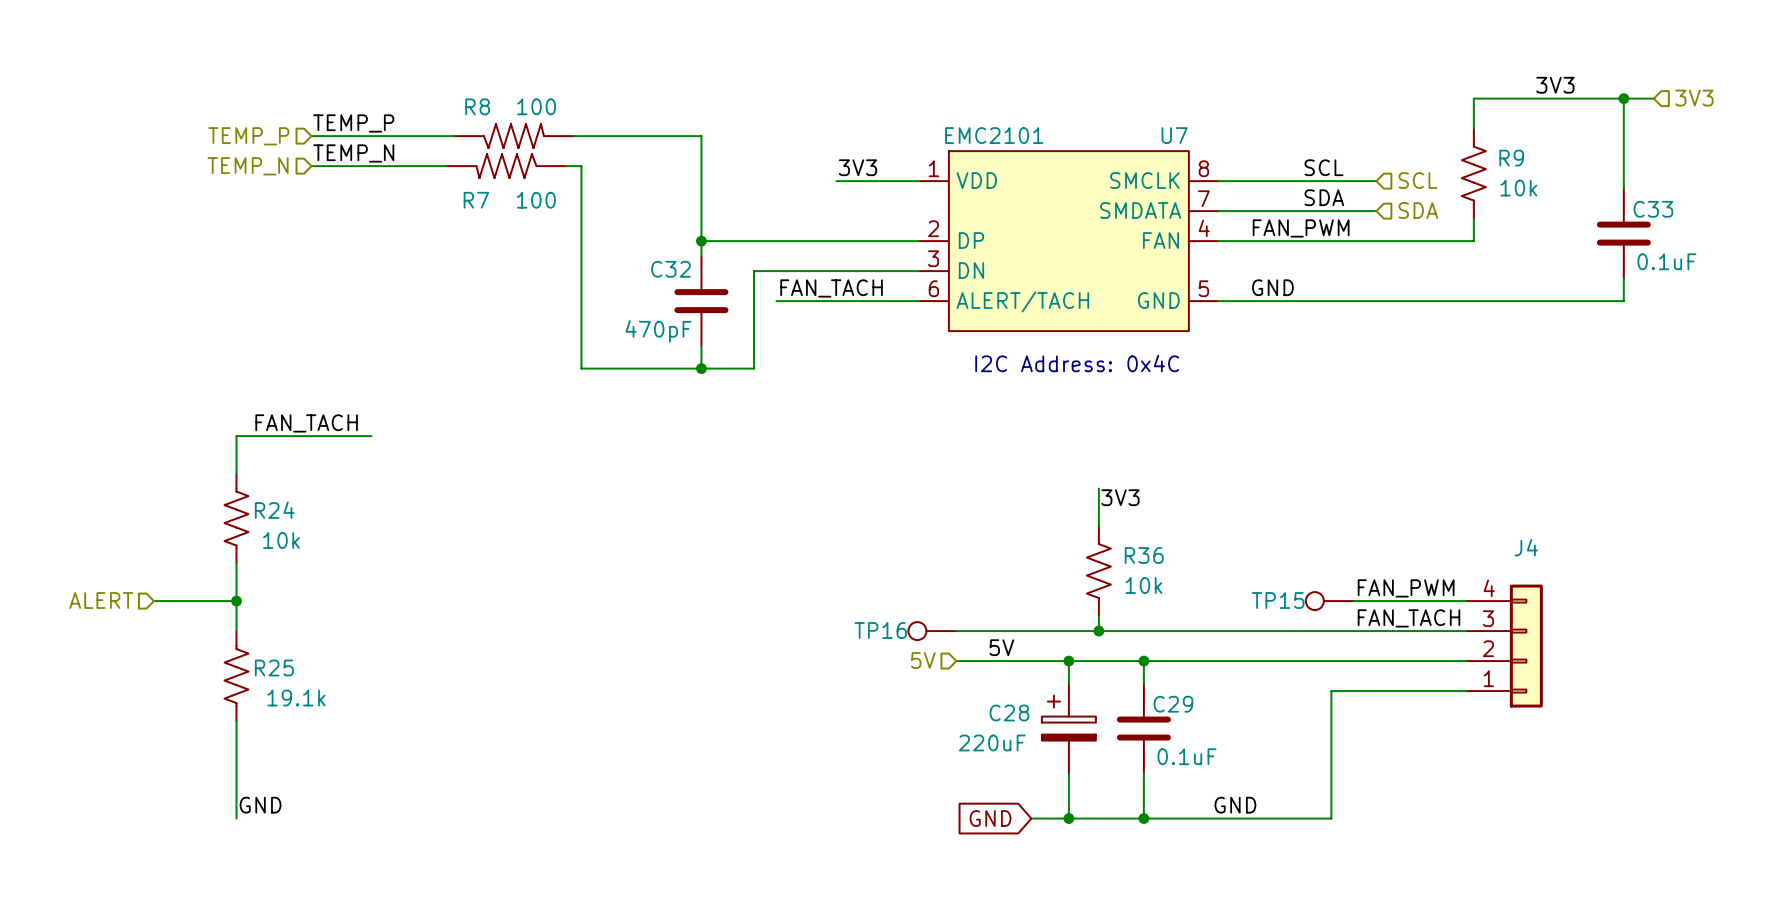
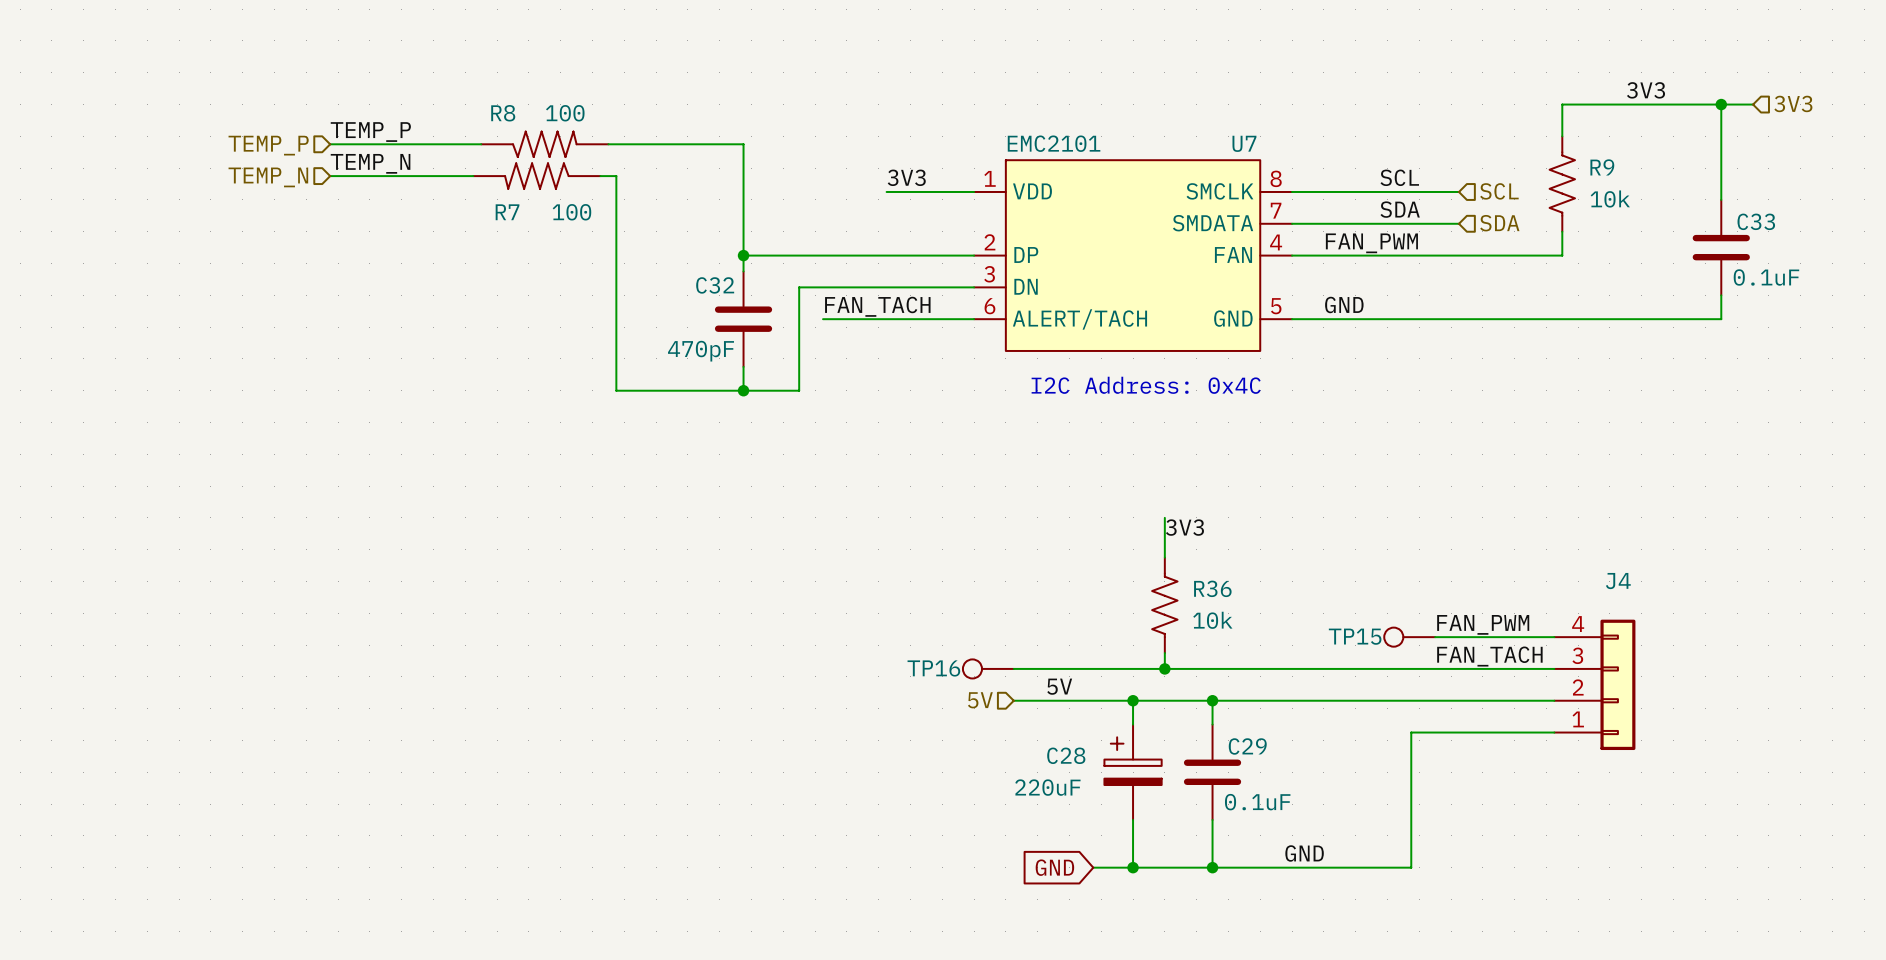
label: FAN_TACH (306, 423) -> none
wire: (371, 436) (236, 436) (236, 473) -> none
R24: 10k (236, 518) -> none
wire: (236, 563) (236, 631) -> none
hierarchical label: ALERT (101, 600) -> none
wire: (154, 601) (236, 601) -> none
junction: (236, 601) -> none
R25: 19.1k (236, 676) -> none
wire: (236, 721) (236, 818) -> none
label: GND (260, 805) -> none

